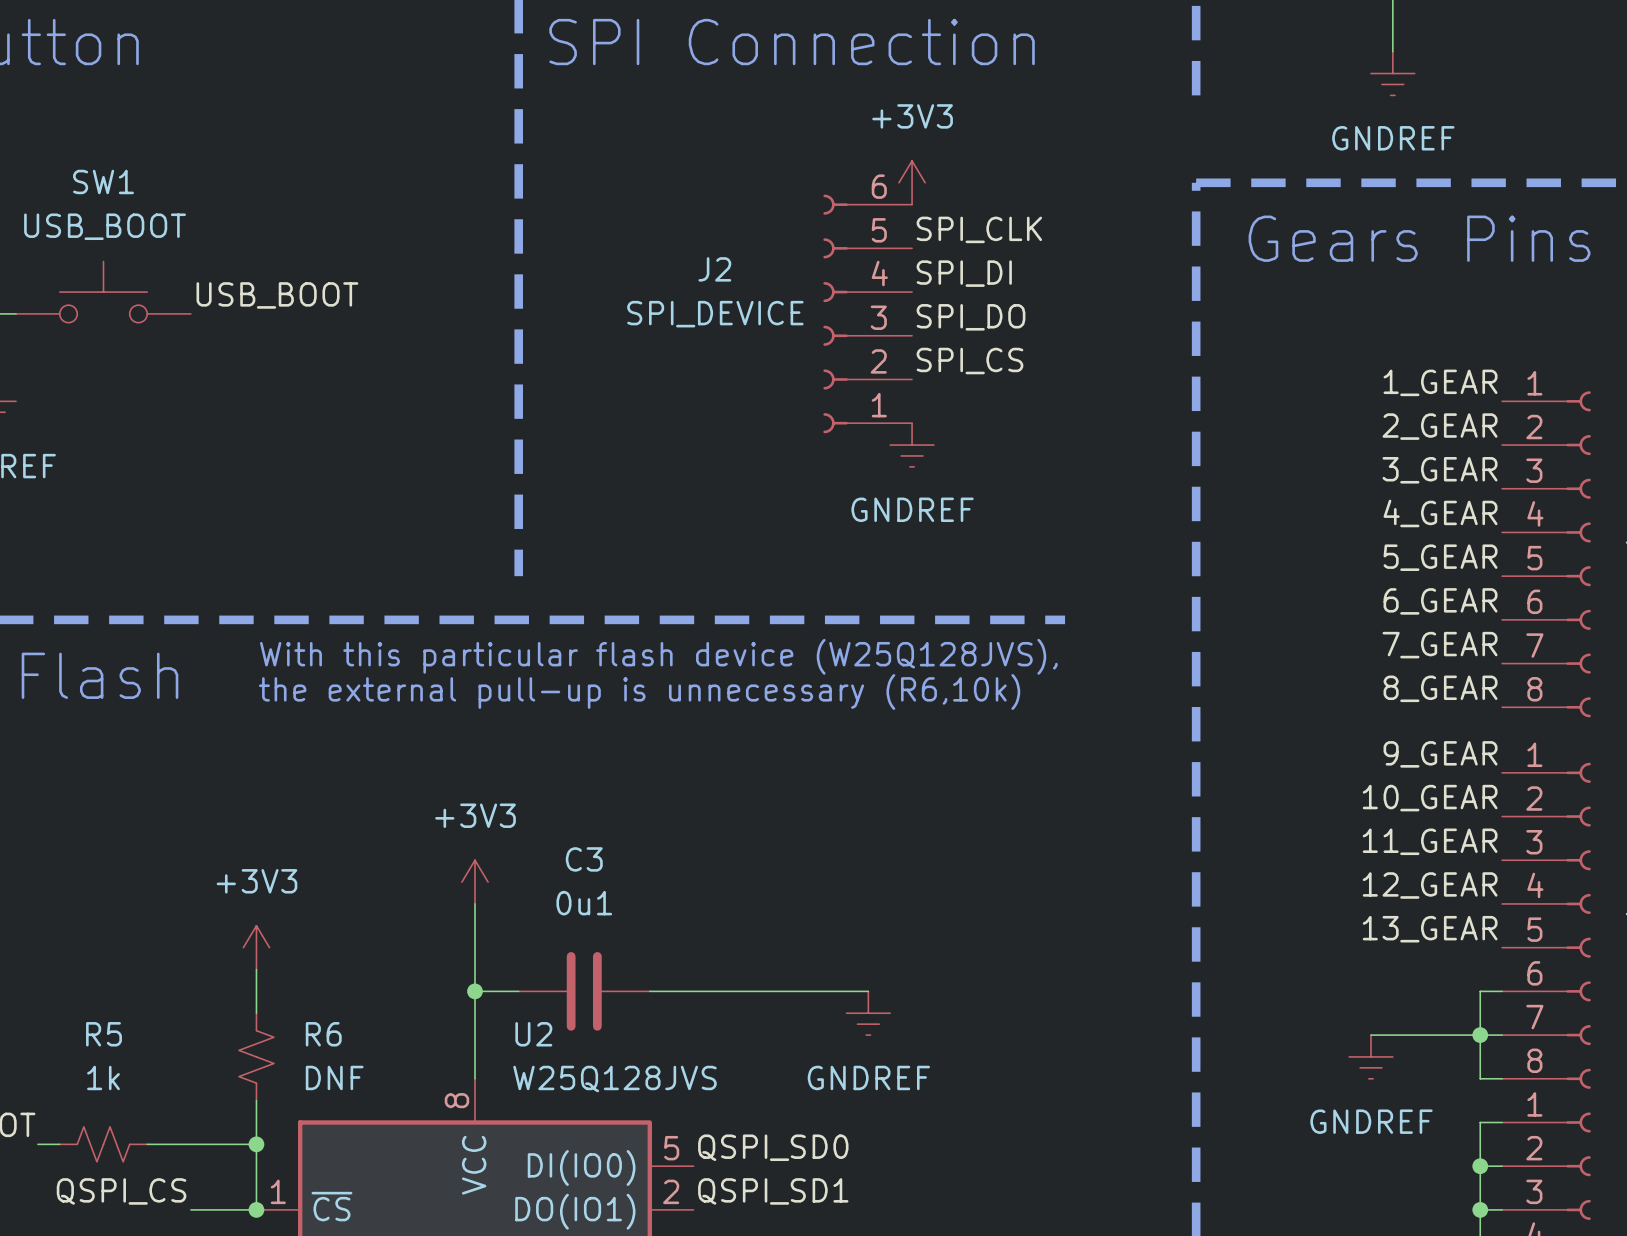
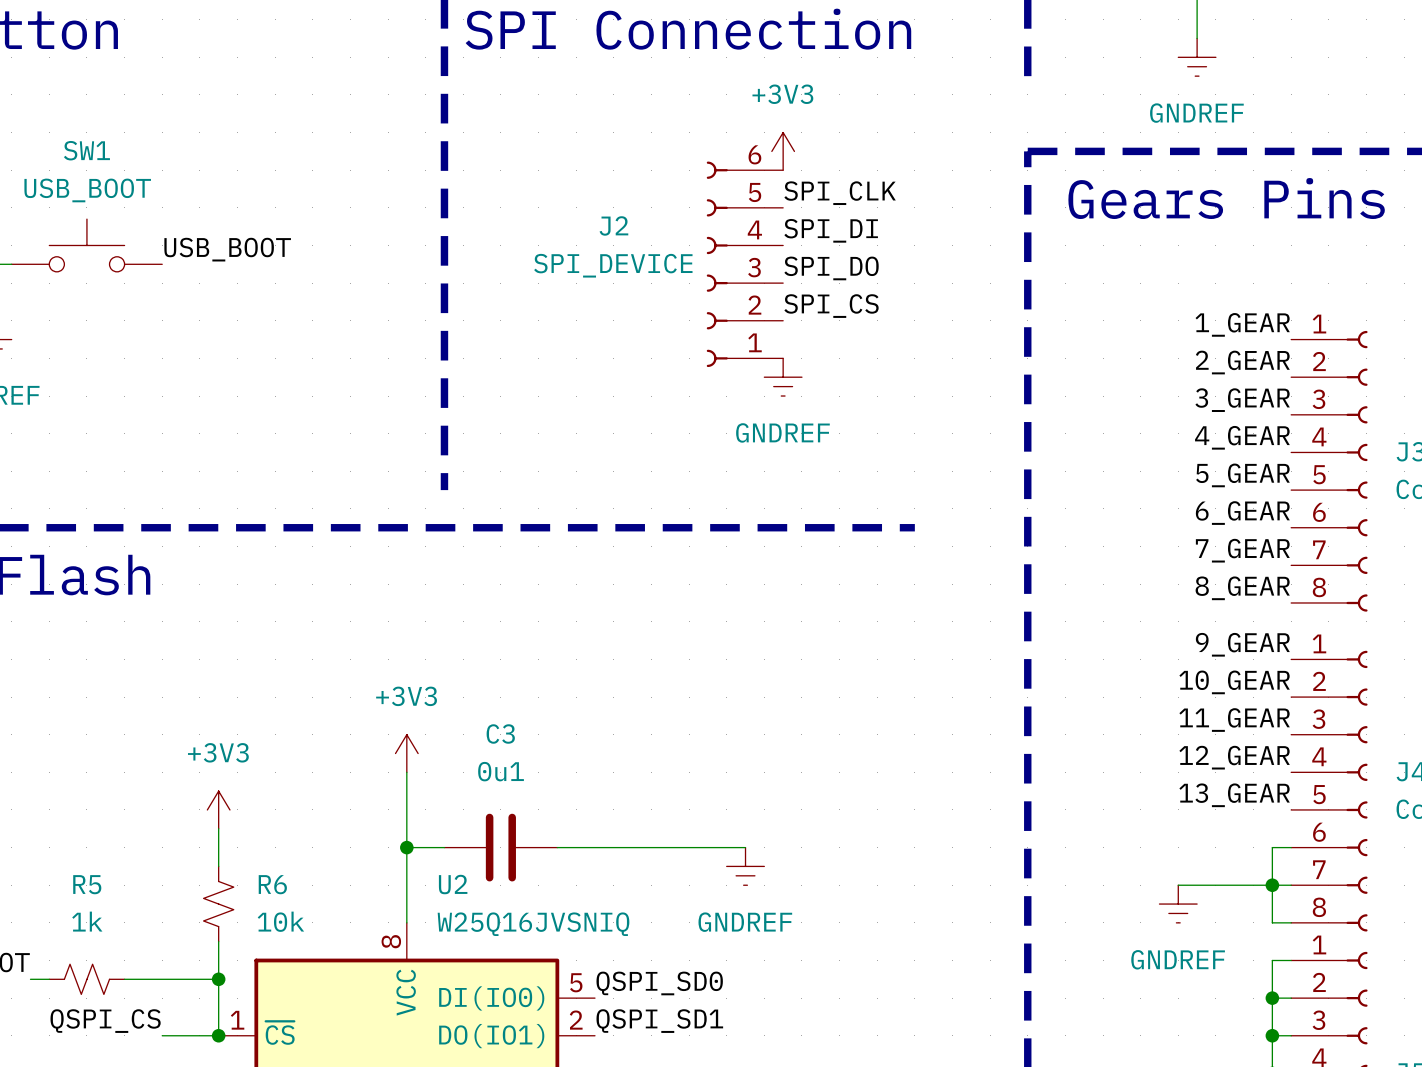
text: With this particular flash device (W25Q128JVS), (658, 656) -> none
text: the external pull-up is unnecessary (R6,10k) (639, 691) -> none
R6 value: DNF (334, 1077) -> 10k (280, 921)
U2 value: W25Q128JVS (615, 1079) -> W25Q16JVSNIQ (533, 924)

